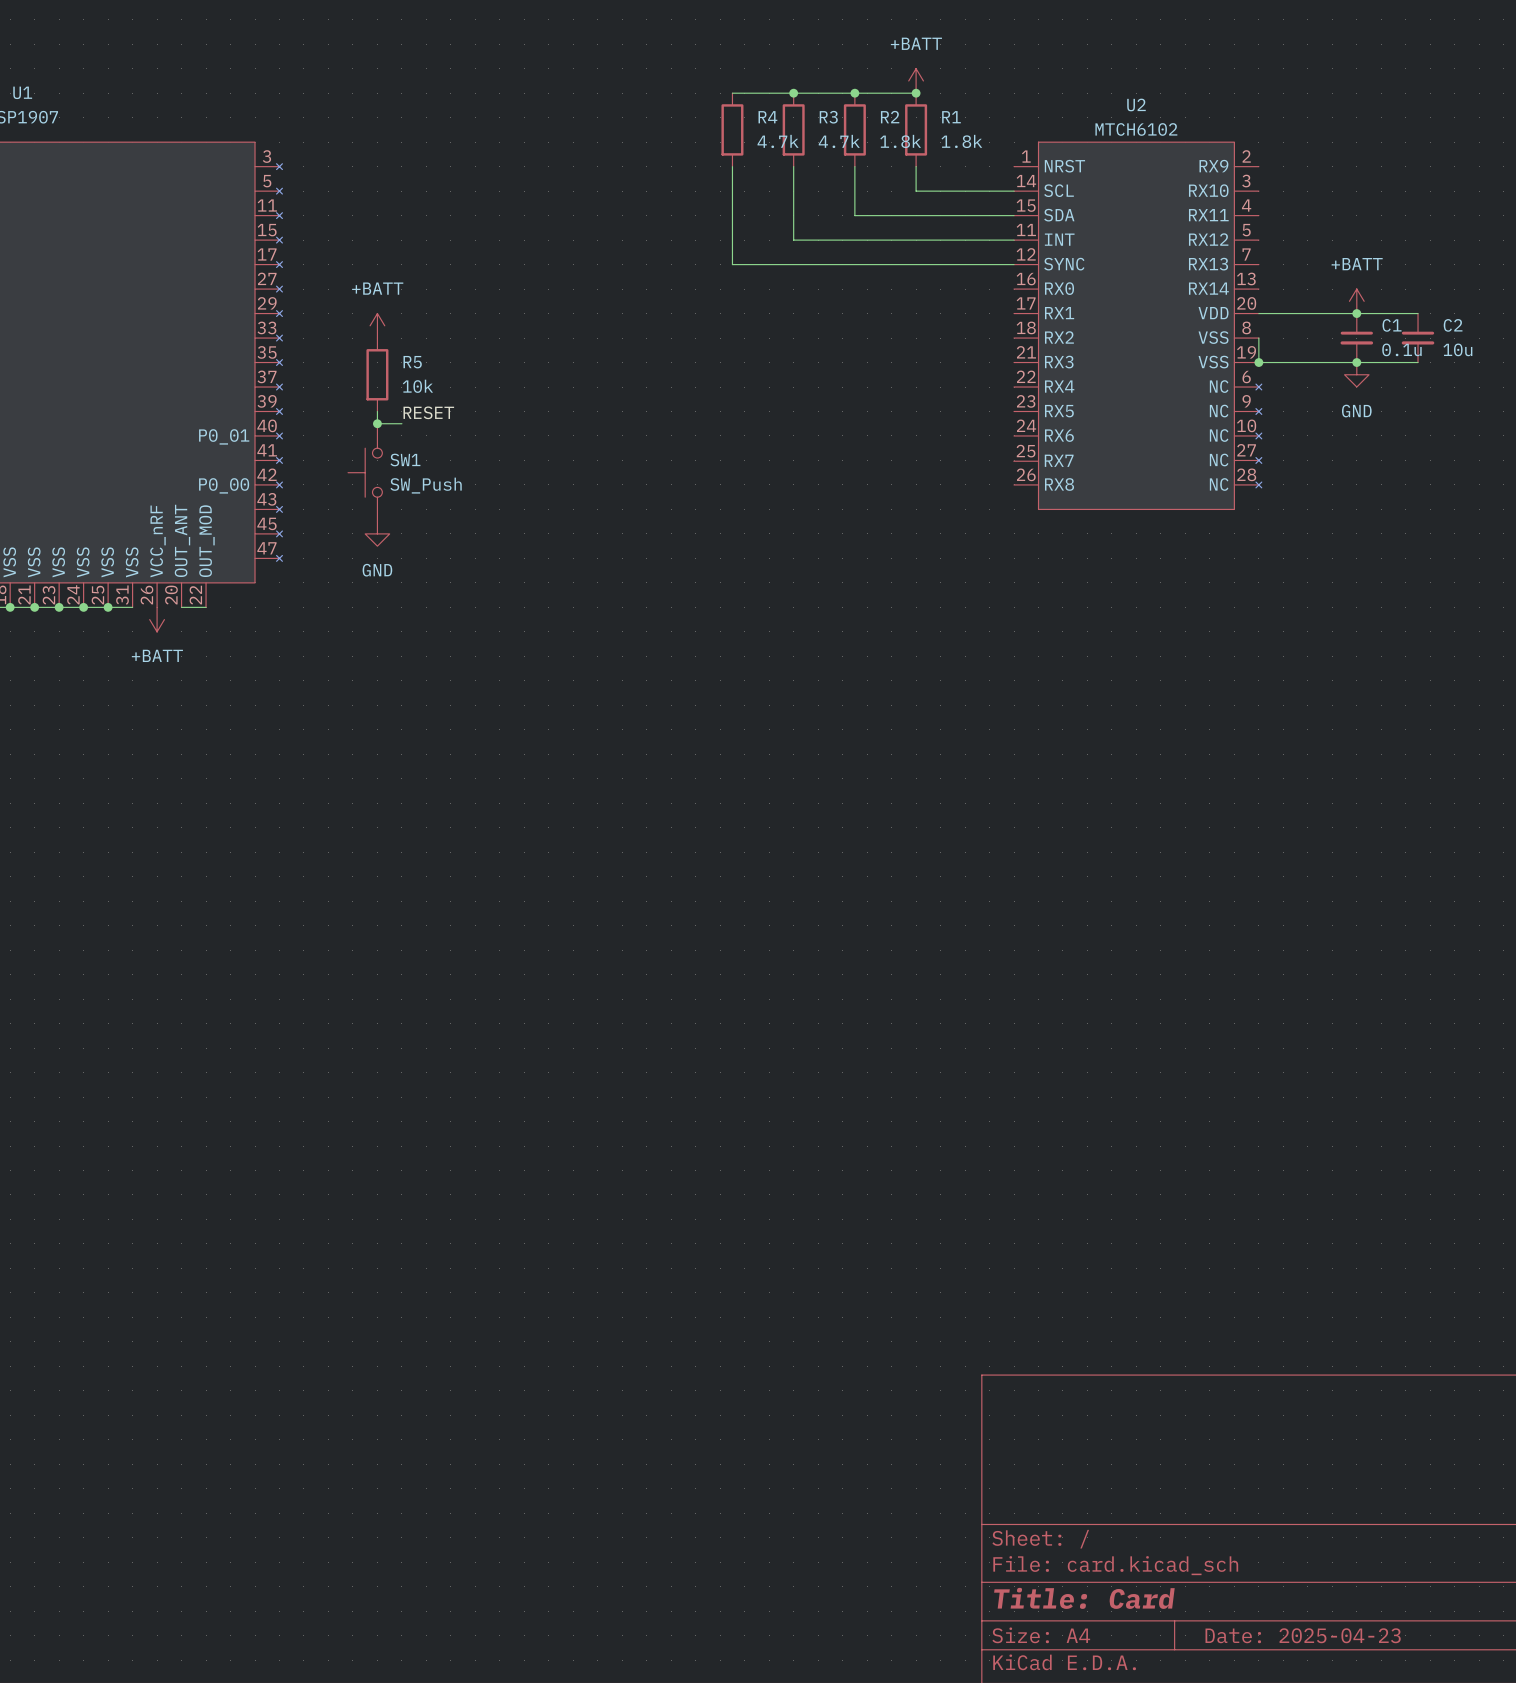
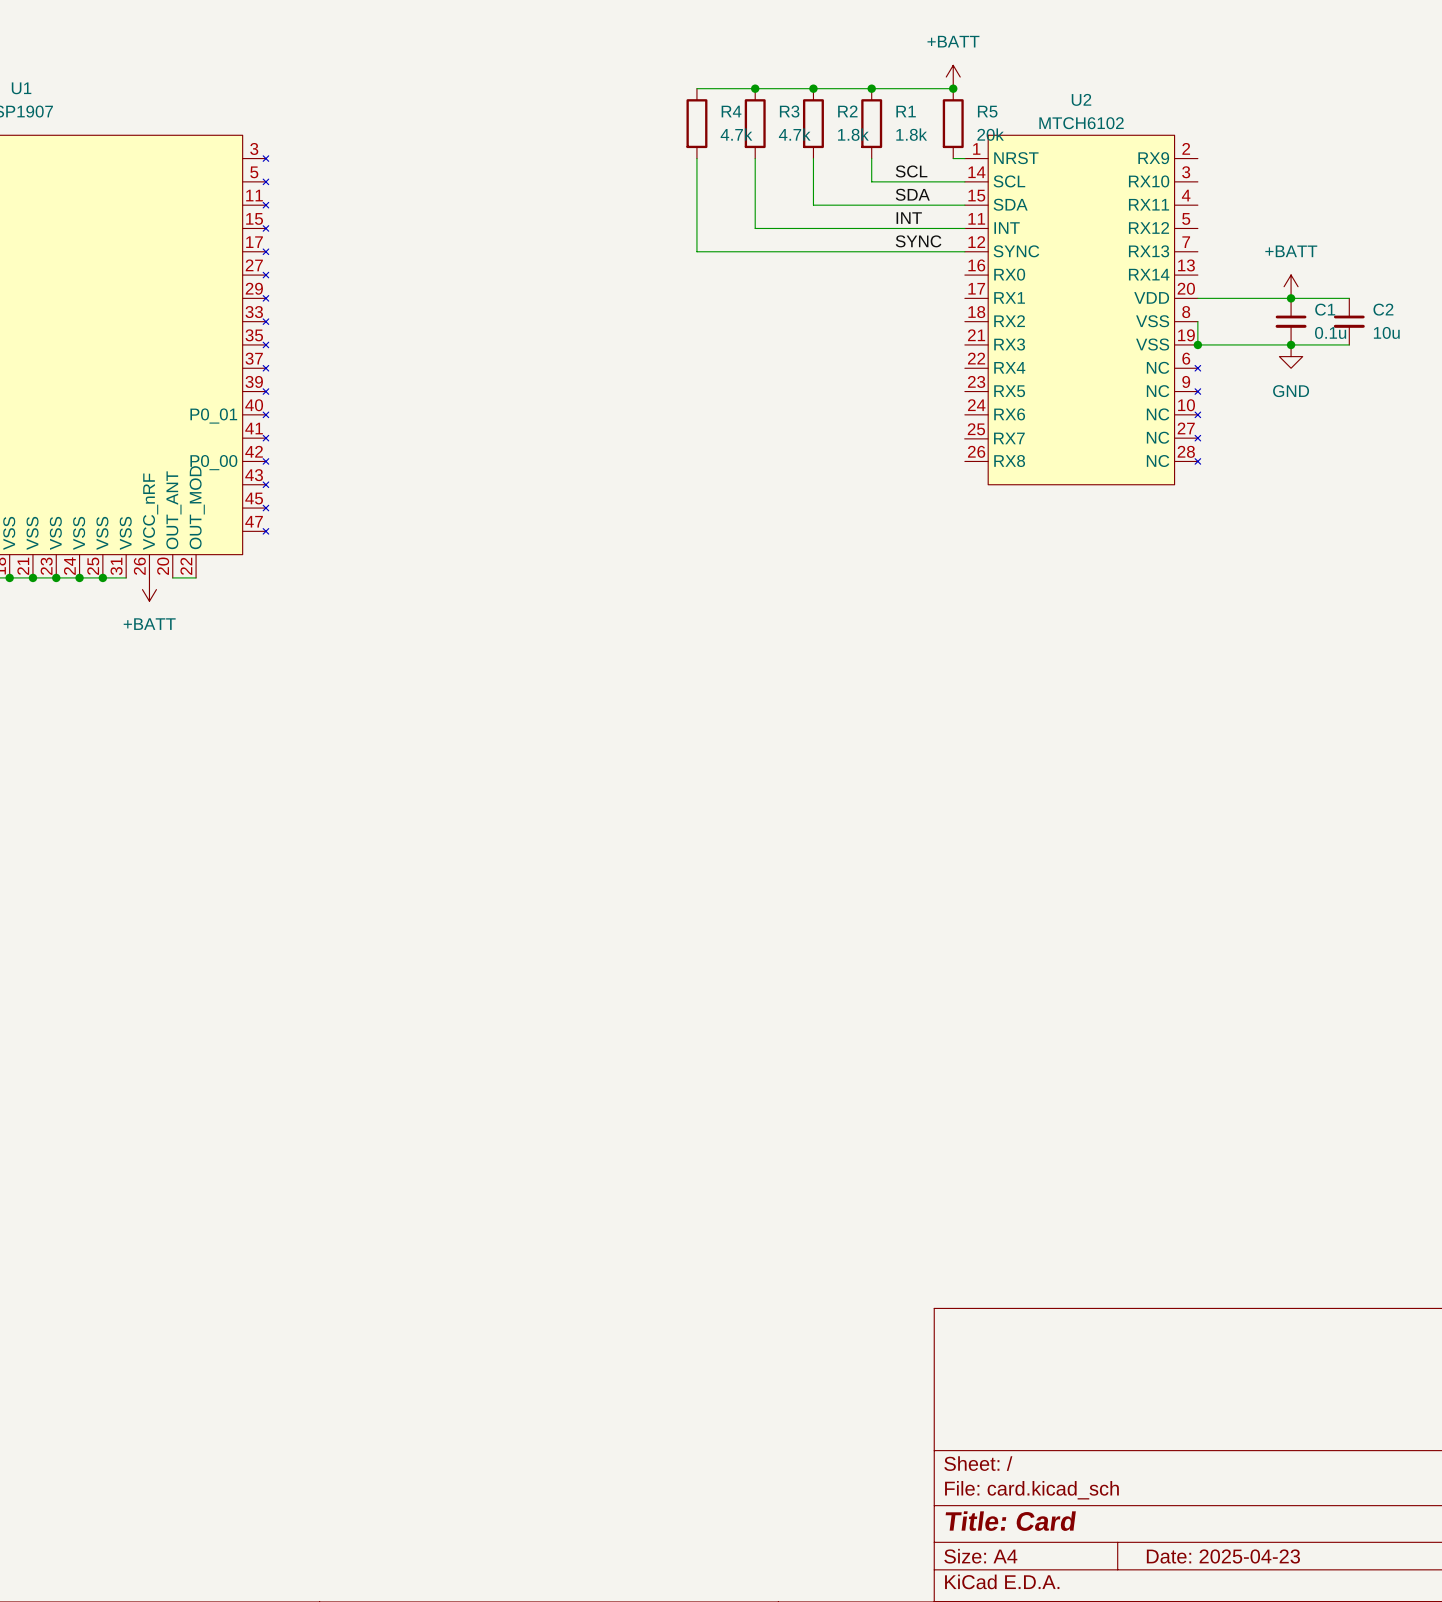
power symbol position: +BATT (916, 80) -> +BATT (953, 77)
wire: none -> (871, 88) (953, 88)
junction: none -> (953, 88)
wire: none -> (953, 158) (964, 158)
label: none -> SCL (911, 171)
label: none -> SDA (912, 194)
label: none -> INT (909, 218)
label: none -> SYNC (918, 241)
power symbol: +BATT (377, 325) -> none
R5 position: (377, 374) -> (953, 123)
R5 value: 10k (417, 386) -> 20k (990, 134)
wire: (377, 411) (377, 423) (401, 423) -> none
label: RESET (428, 412) -> none
junction: (377, 423) -> none
SW1: SW_Push (365, 472) -> none
power symbol: GND (377, 533) -> none

